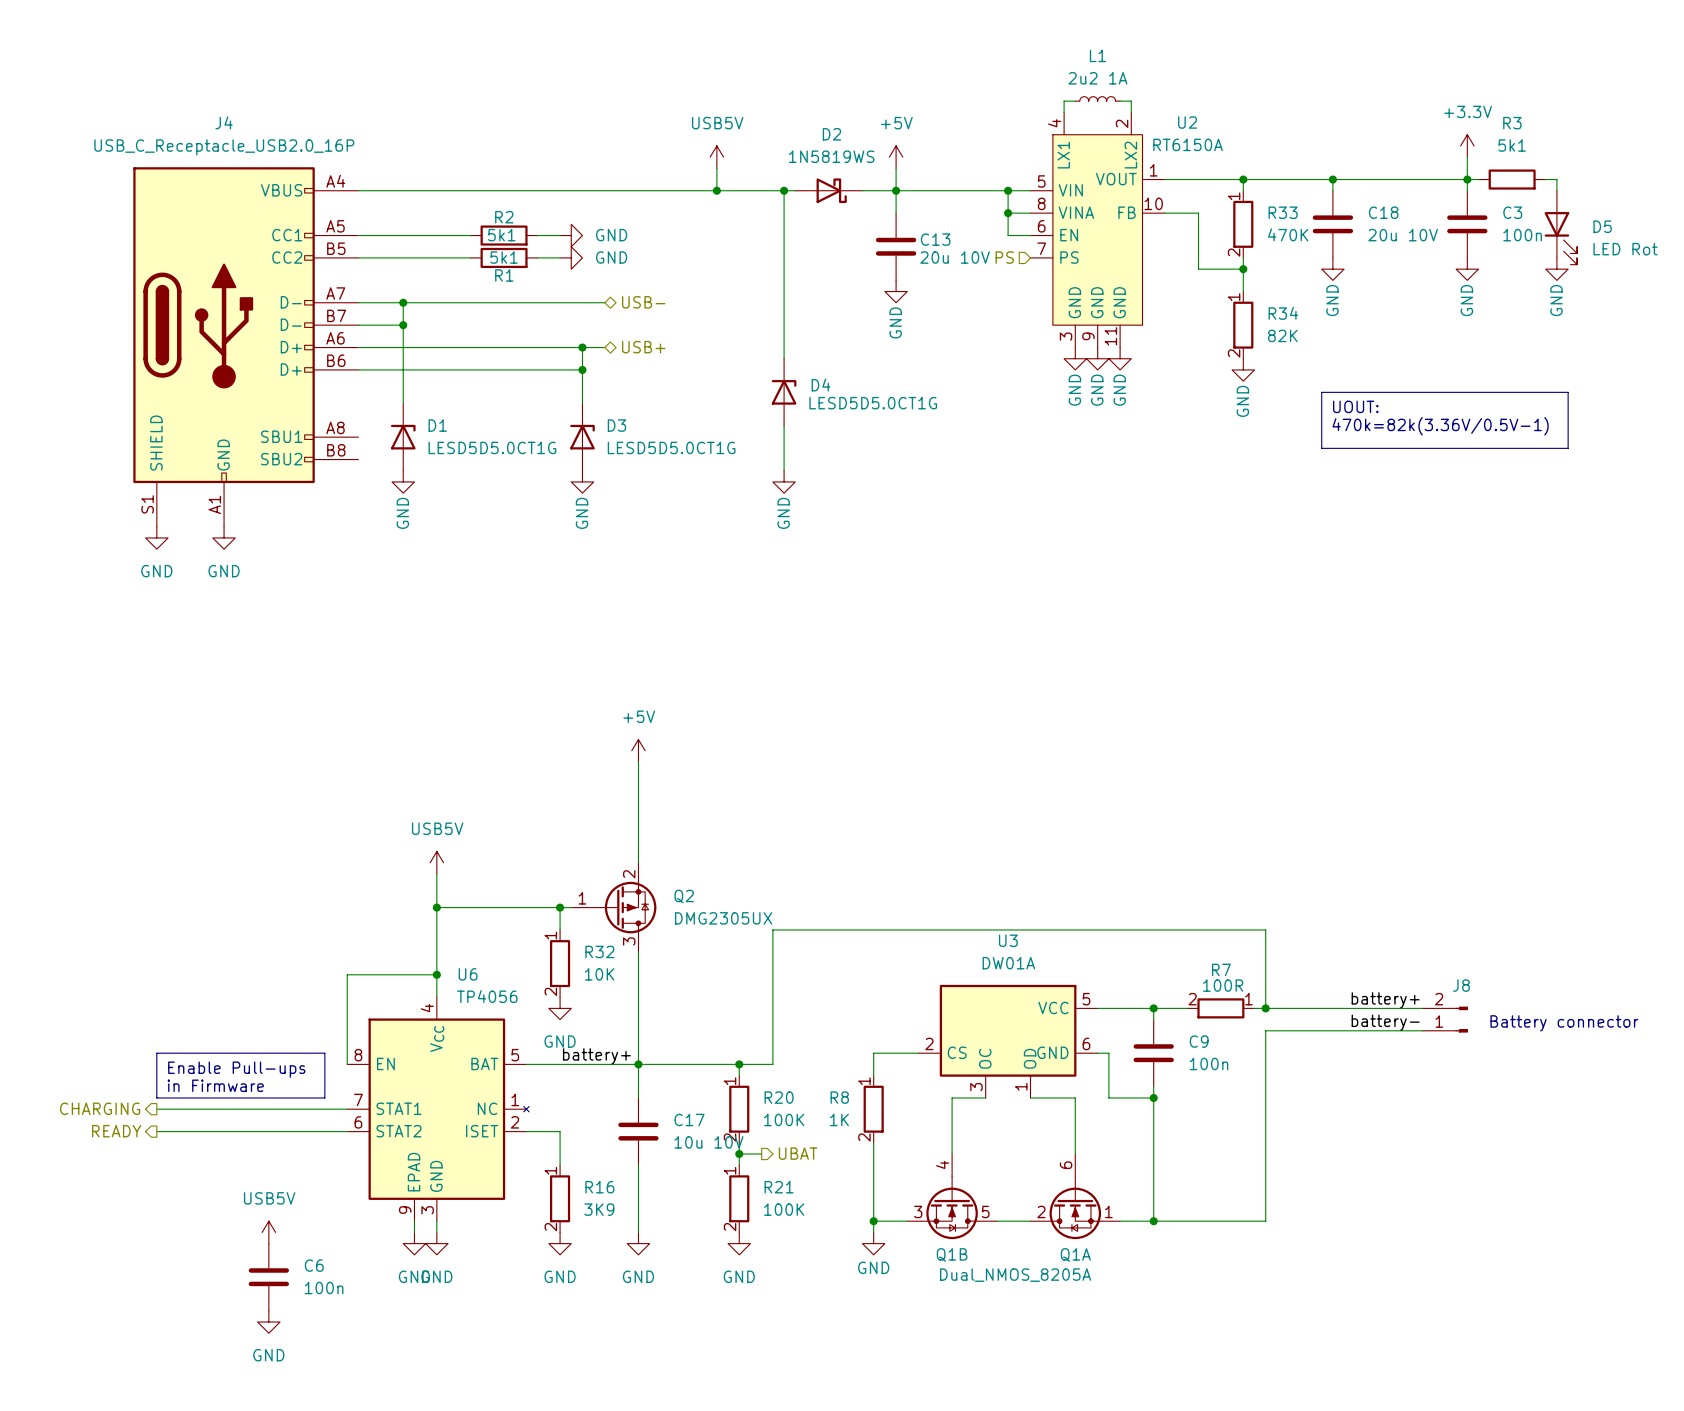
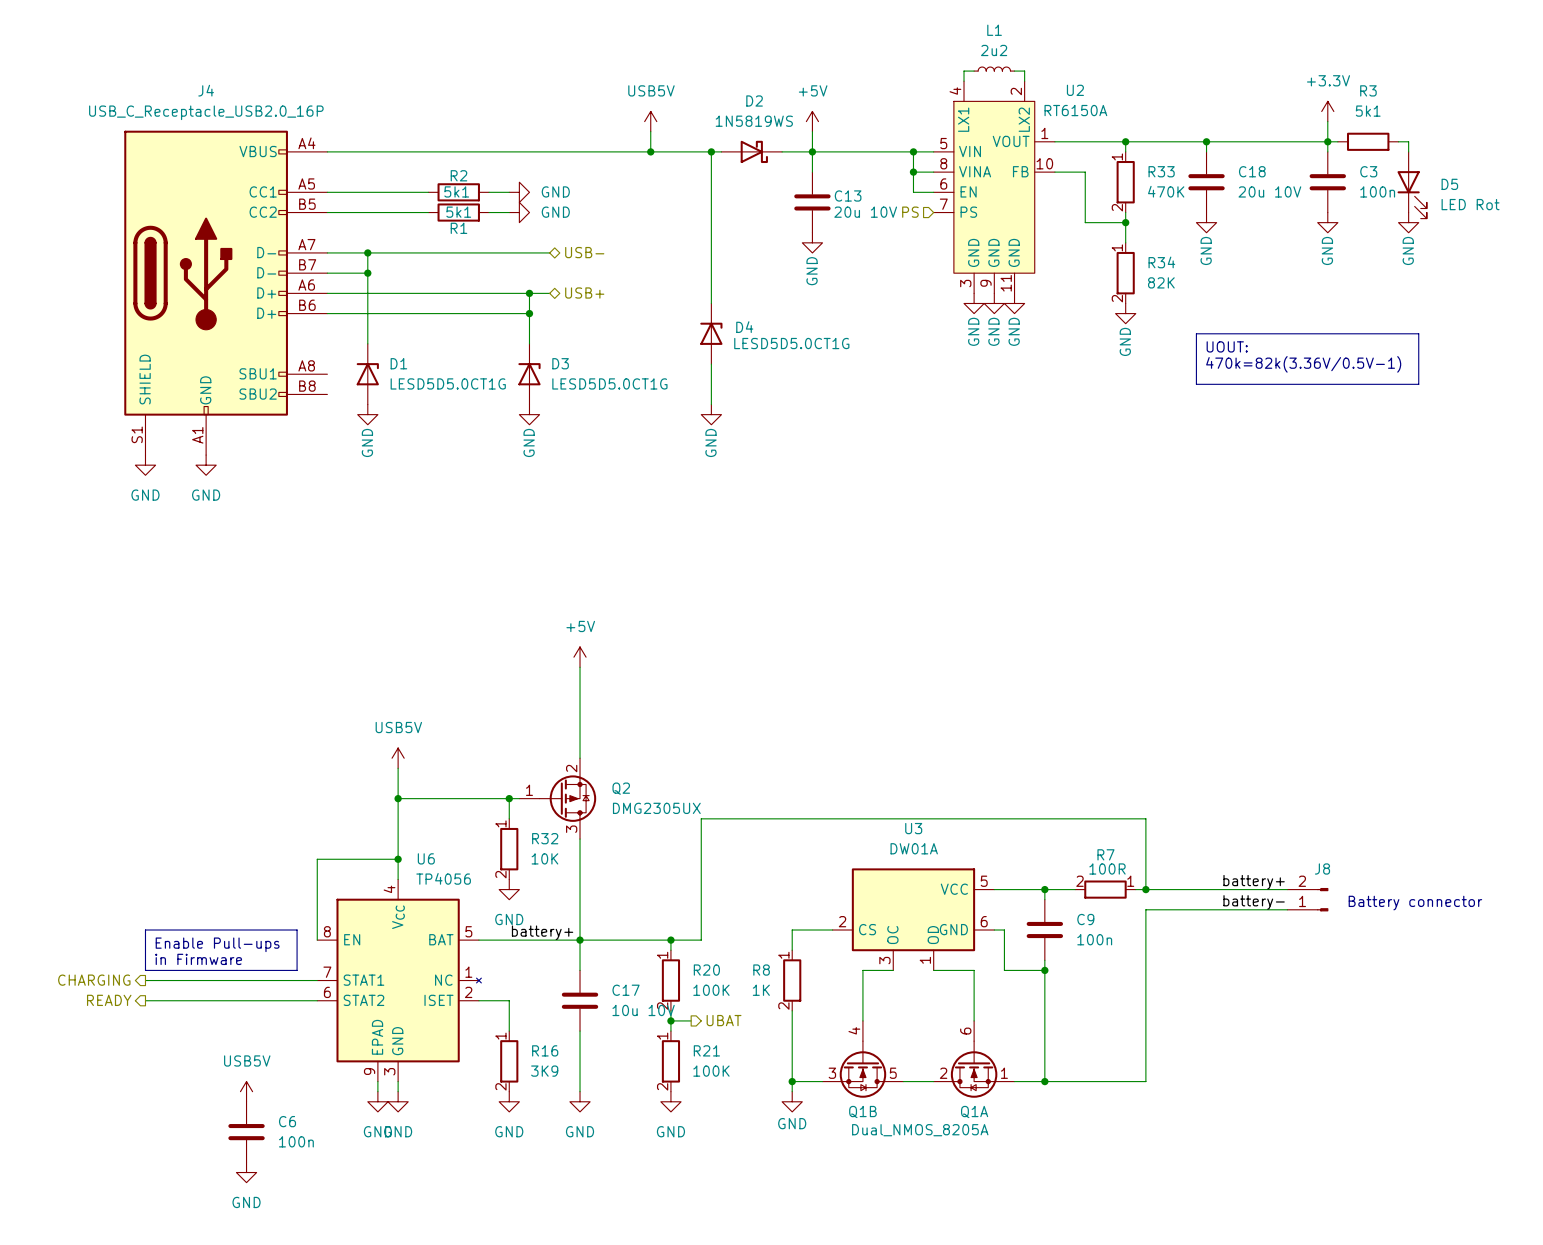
L1 value: 2u2 1A (1097, 78) -> 2u2 (994, 50)

